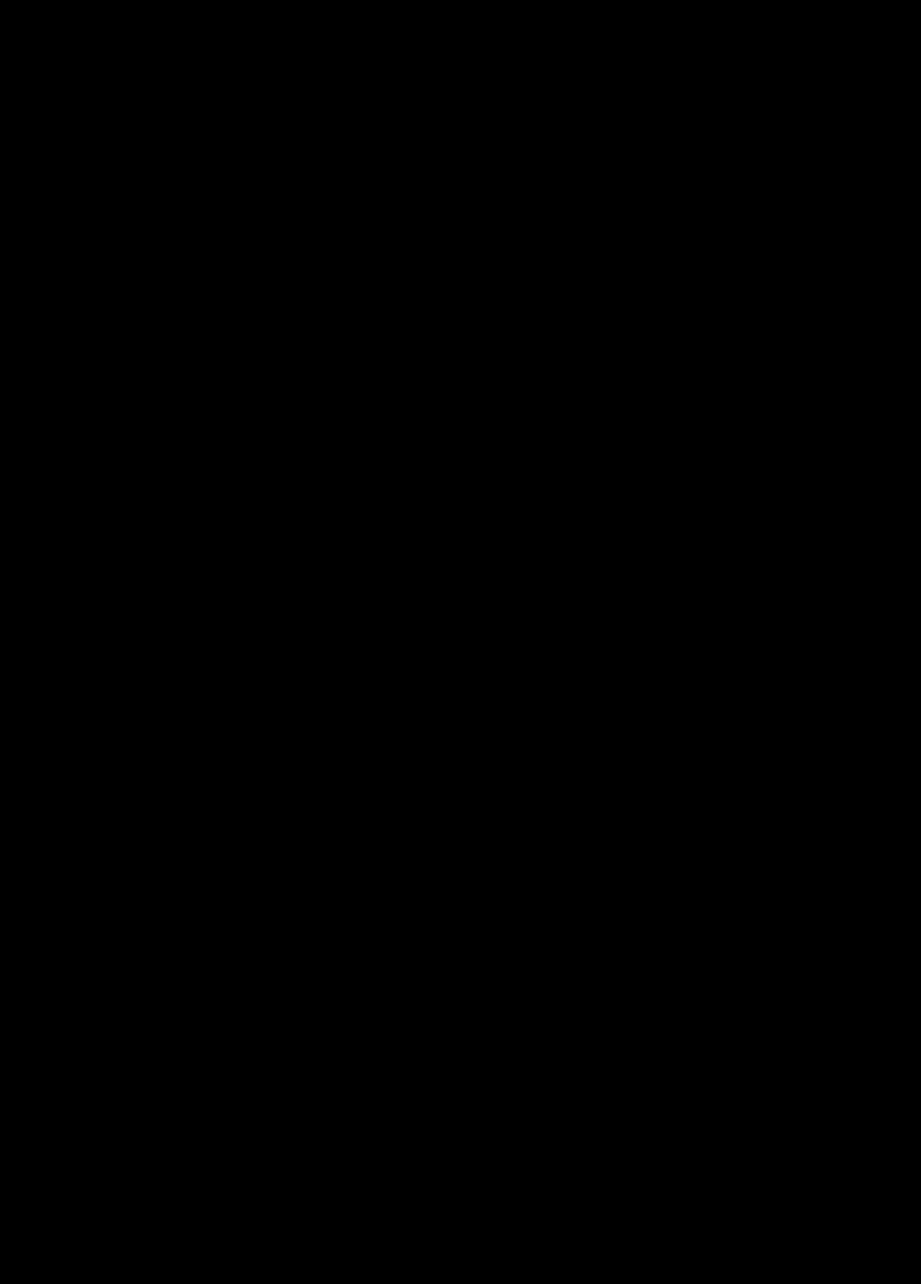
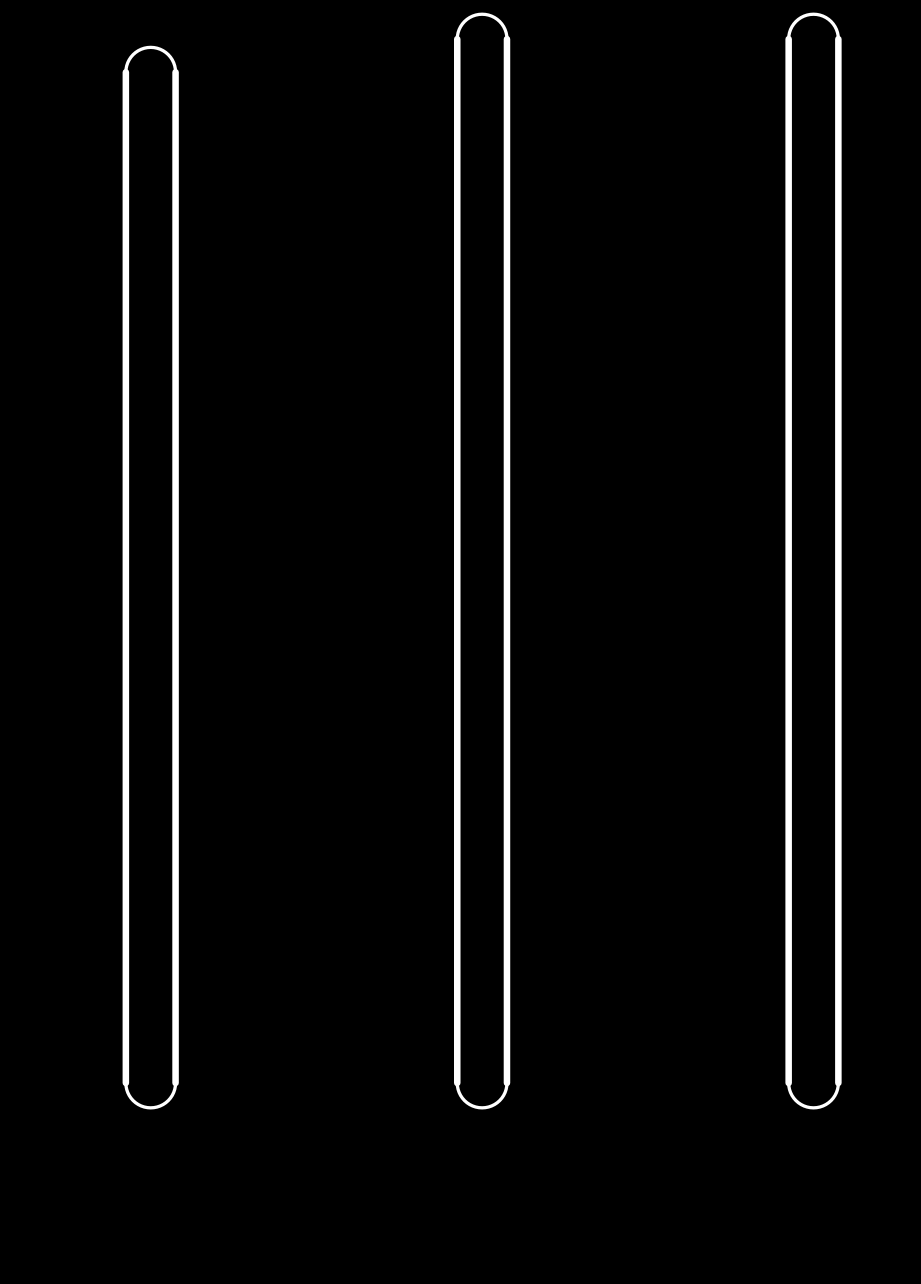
board edge: none -> (506, 39) (506, 1083) (505, 1092) (499, 1100) (491, 1105) (482, 1107) (472, 1105) (464, 1100) (459, 1092) (457, 1083) (457, 39) (459, 29) (464, 21) (472, 16) (482, 14) (491, 16) (499, 21) (505, 29) (506, 39)
board edge: none -> (838, 39) (838, 1083) (836, 1092) (831, 1100) (823, 1105) (813, 1107) (804, 1105) (795, 1100) (790, 1092) (788, 1083) (788, 39) (790, 29) (795, 21) (804, 16) (813, 14) (823, 16) (831, 21) (836, 29) (838, 39)
board edge: none -> (175, 72) (175, 1083) (173, 1092) (168, 1100) (160, 1105) (150, 1107) (141, 1105) (133, 1100) (127, 1092) (125, 1083) (125, 72) (127, 62) (133, 54) (141, 49) (150, 47) (160, 49) (168, 54) (173, 62) (175, 72)

